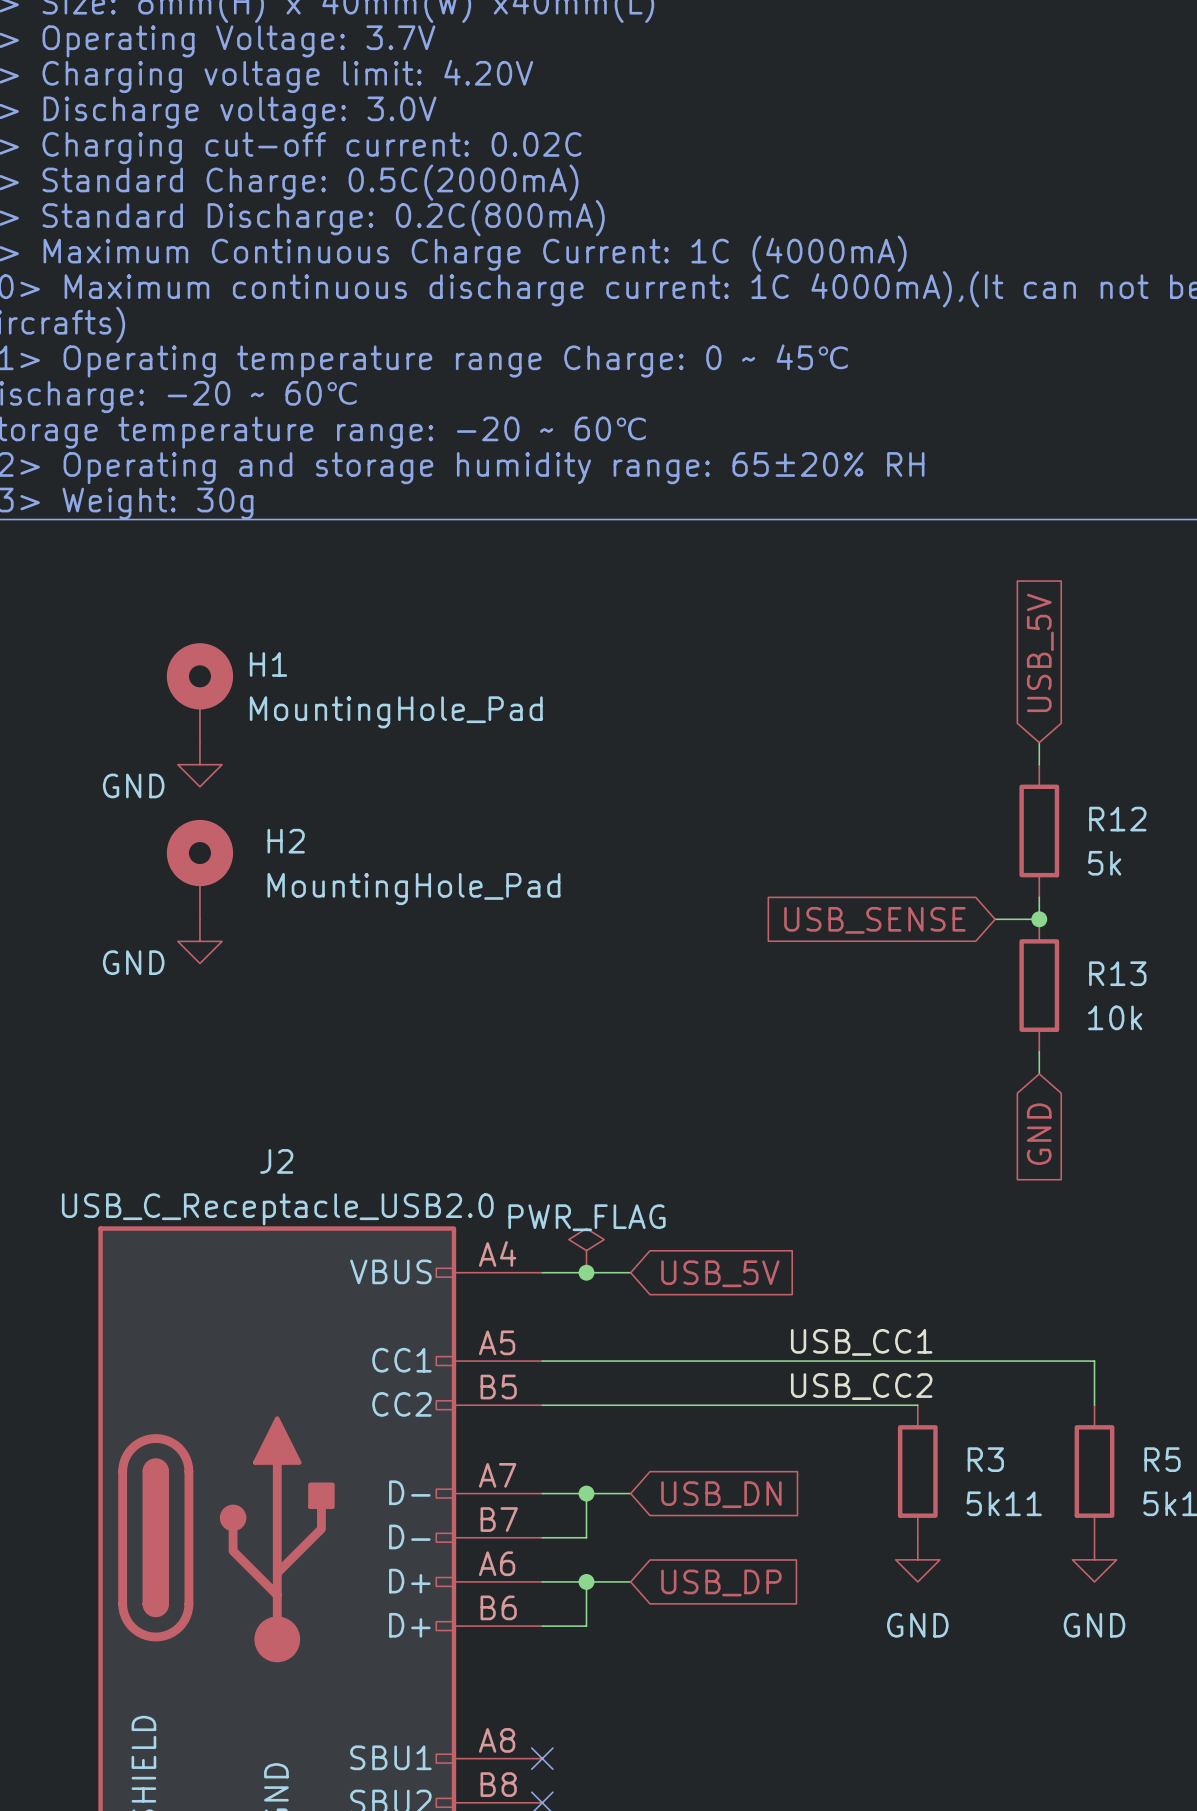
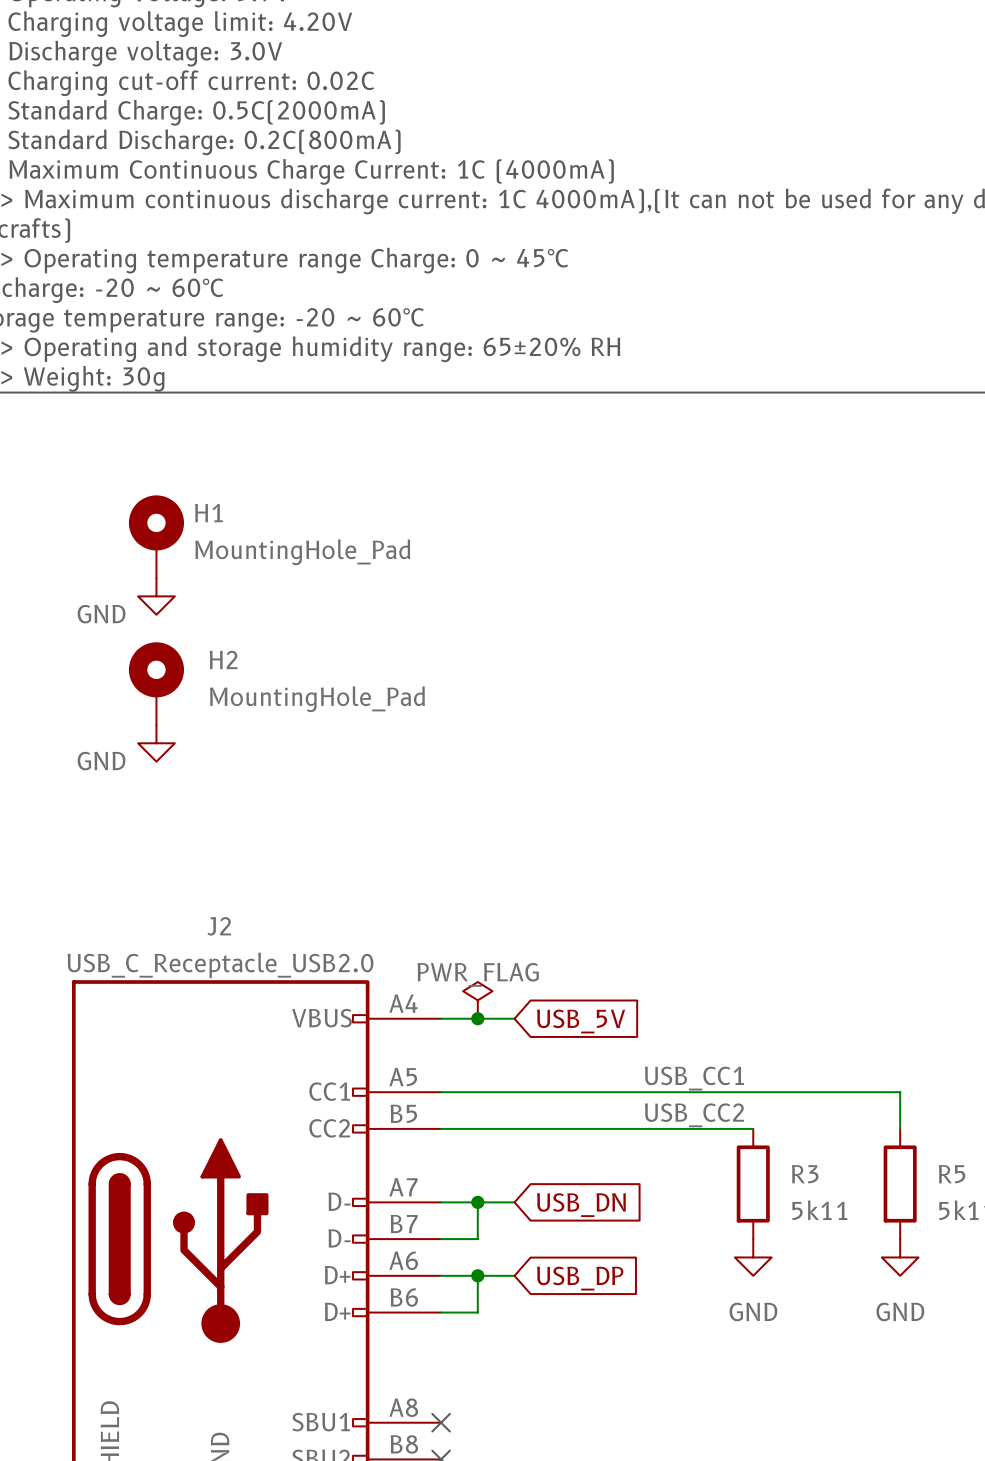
global label: USB_5V (1040, 652) -> none
wire: (1039, 742) (1039, 764) -> none
R12: 5k (1039, 830) -> none
wire: (1039, 897) (1039, 919) (995, 919) -> none
junction: (1039, 919) -> none
global label: USB_SENSE (874, 920) -> none
R13: 10k (1039, 985) -> none
wire: (1039, 1051) (1039, 1073) -> none
global label: GND (1039, 1134) -> none

